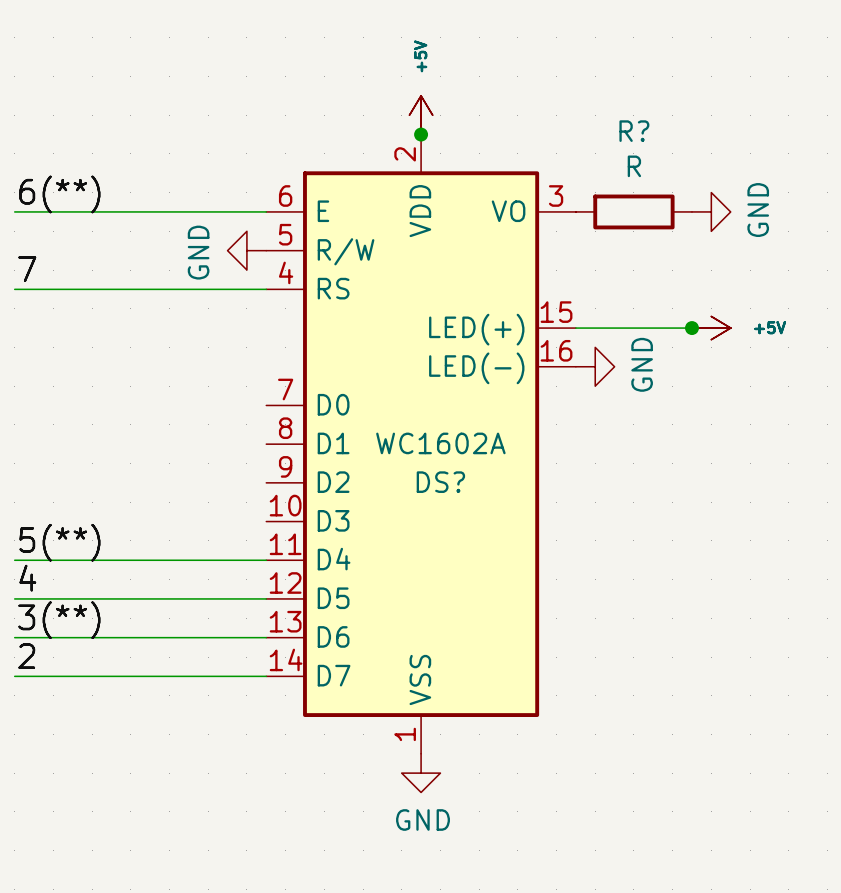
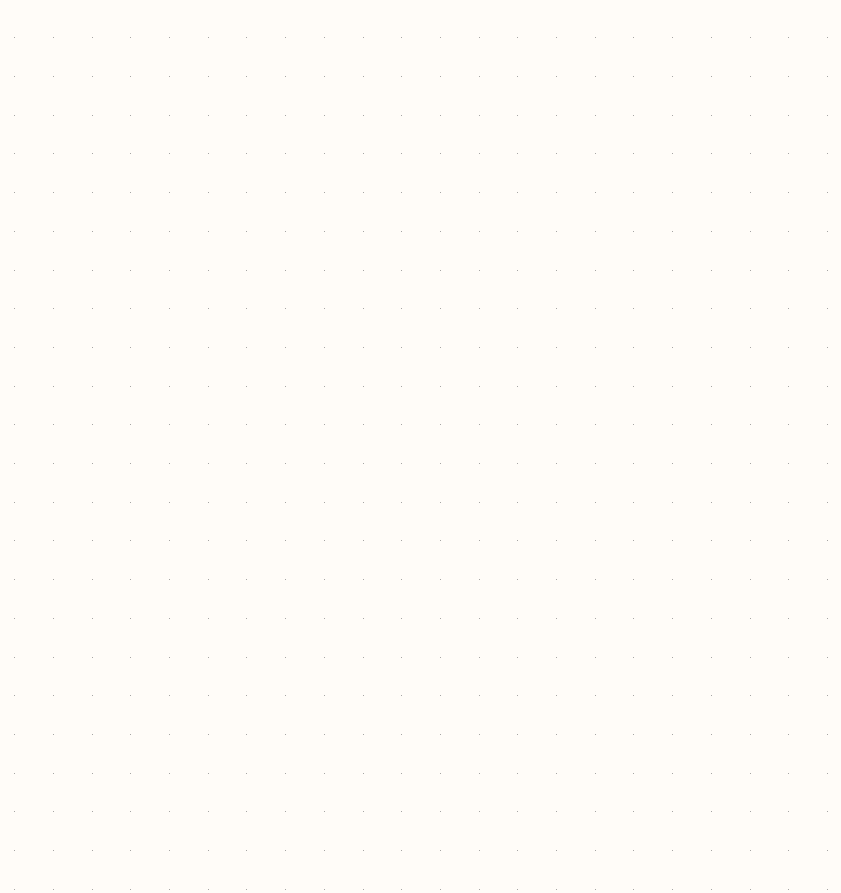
power symbol: +5V (421, 115) -> none
junction: (421, 134) -> none
label: 6(**) (59, 194) -> none
wire: (14, 211) (266, 211) -> none
R?: R (633, 211) -> none
power symbol: GND (711, 211) -> none
power symbol: GND (246, 250) -> none
label: 7 (27, 269) -> none
wire: (14, 289) (266, 289) -> none
wire: (575, 328) (691, 328) -> none
junction: (691, 328) -> none
power symbol: +5V (711, 328) -> none
power symbol: GND (595, 366) -> none
DS?: WC1602A (421, 444) -> none
label: 5(**) (59, 542) -> none
wire: (14, 560) (266, 560) -> none
label: 4 (27, 578) -> none
wire: (14, 598) (266, 598) -> none
label: 3(**) (59, 620) -> none
wire: (14, 637) (266, 637) -> none
label: 2 (26, 656) -> none
wire: (14, 676) (266, 676) -> none
power symbol: GND (421, 773) -> none

